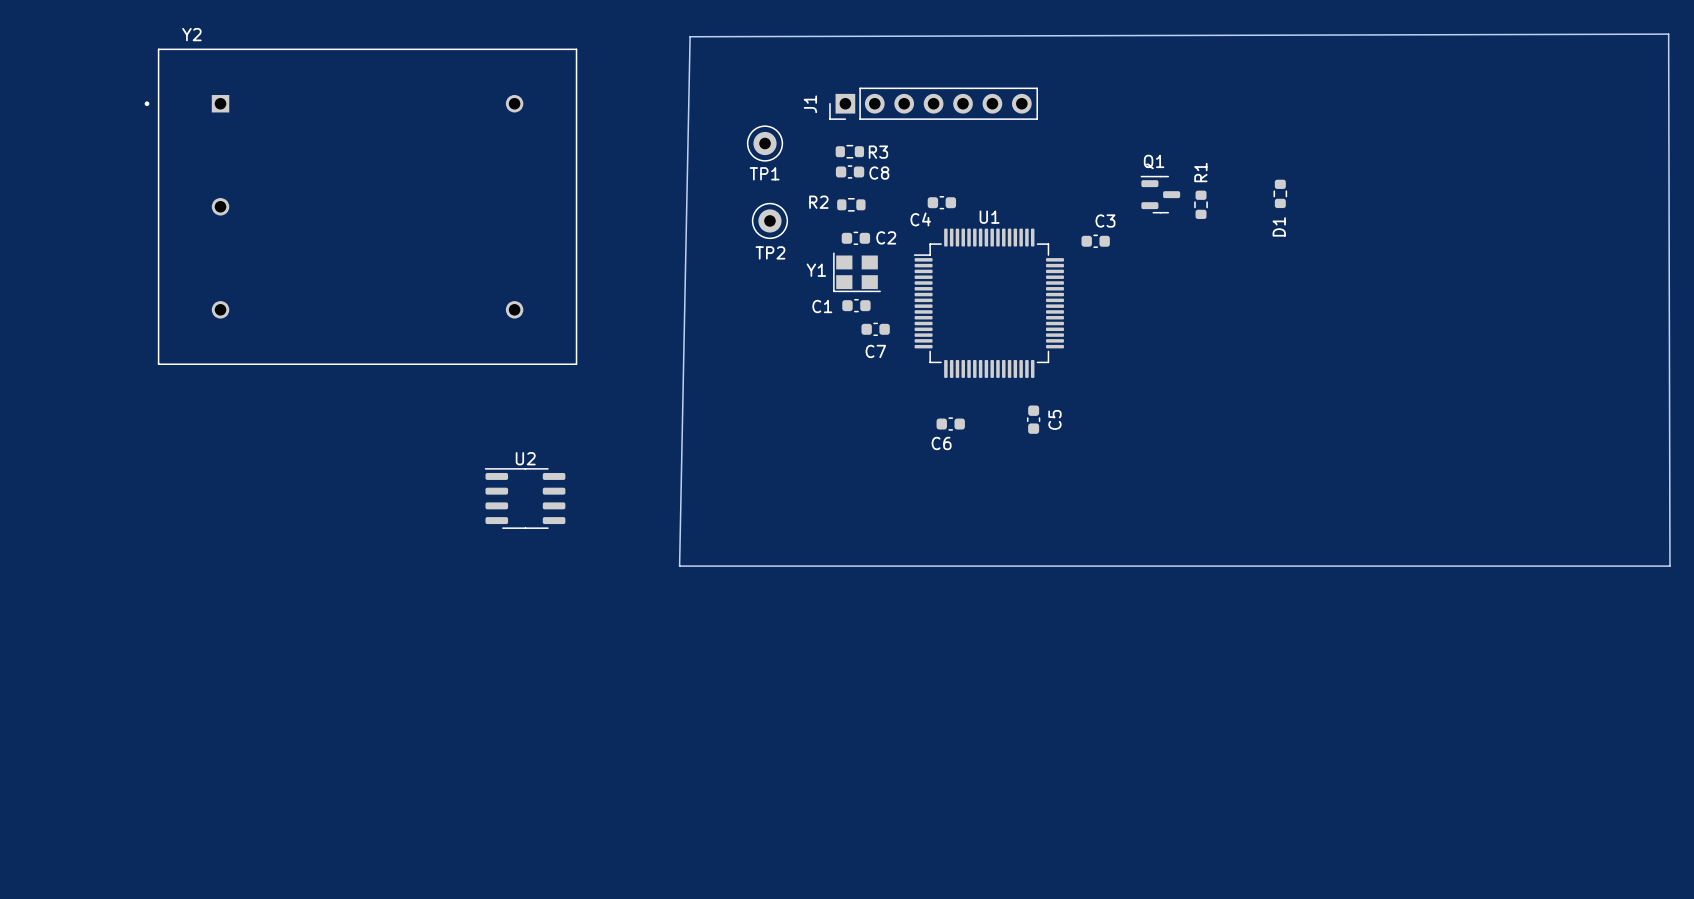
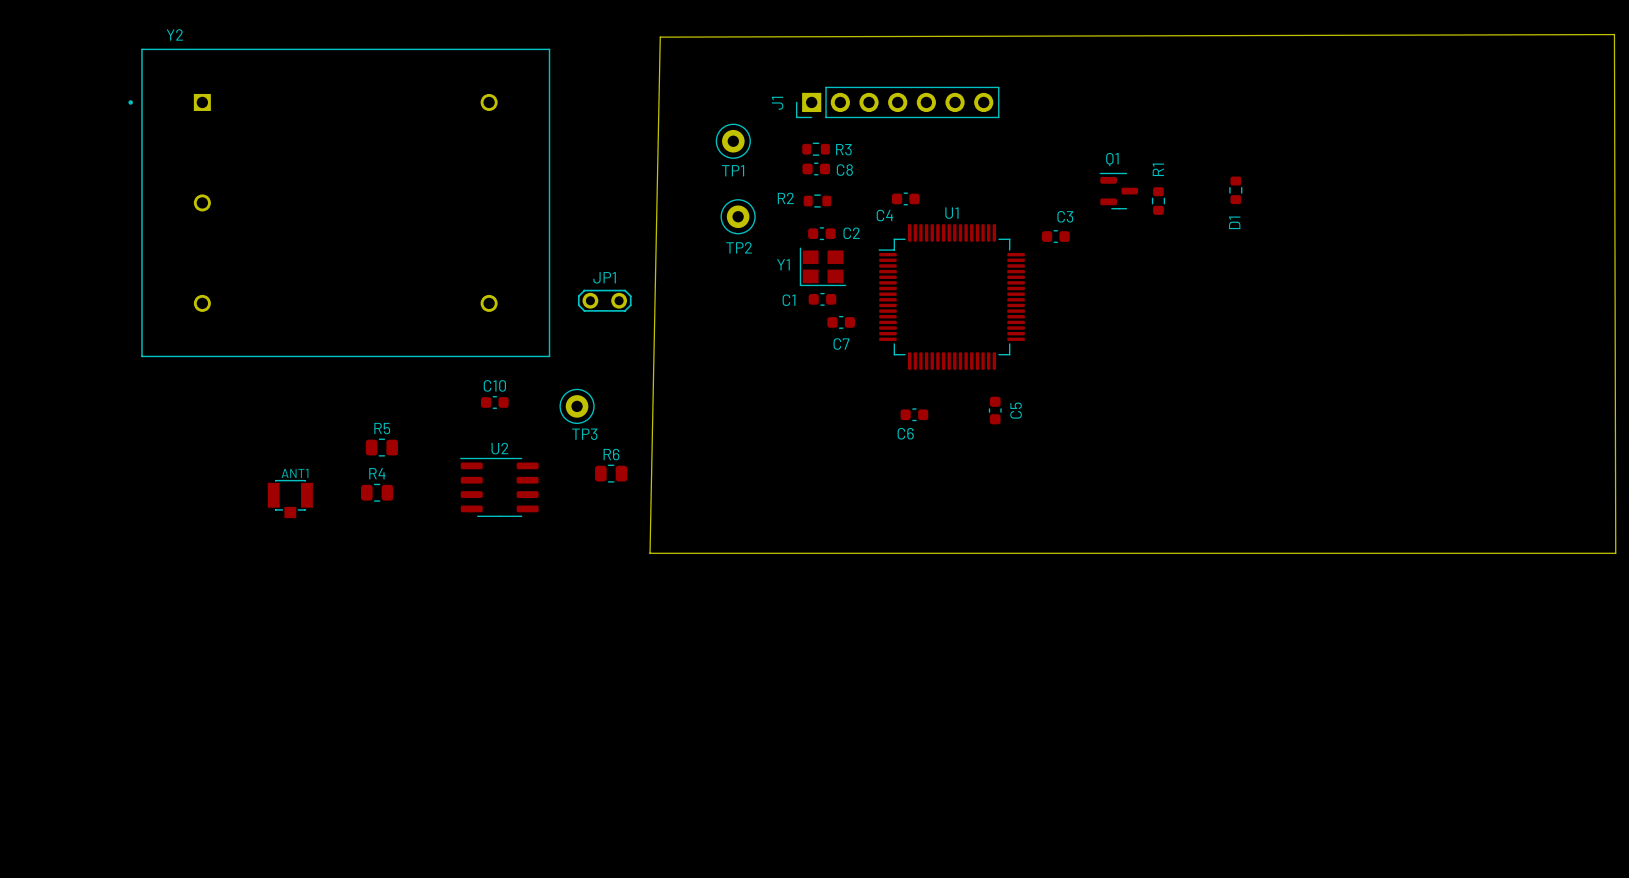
JP1: none -> (604, 300)
C10: none -> (494, 402)
TP3: none -> (577, 406)
R5: none -> (381, 447)
R6: none -> (611, 473)
R4: none -> (377, 492)
ANT1: none -> (290, 499)

